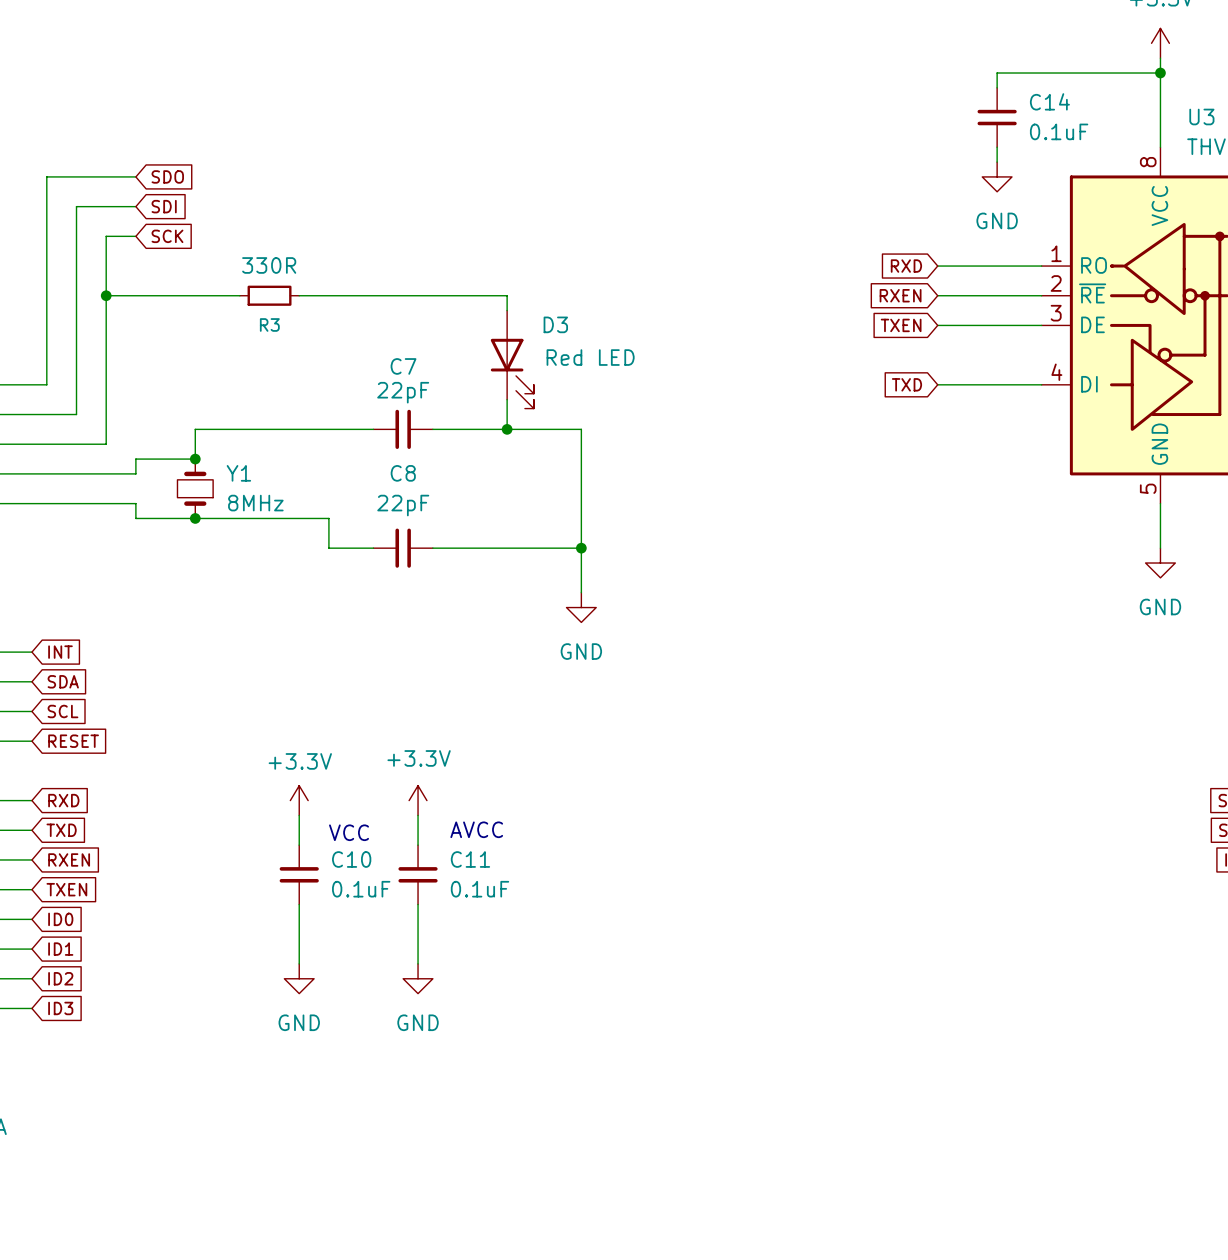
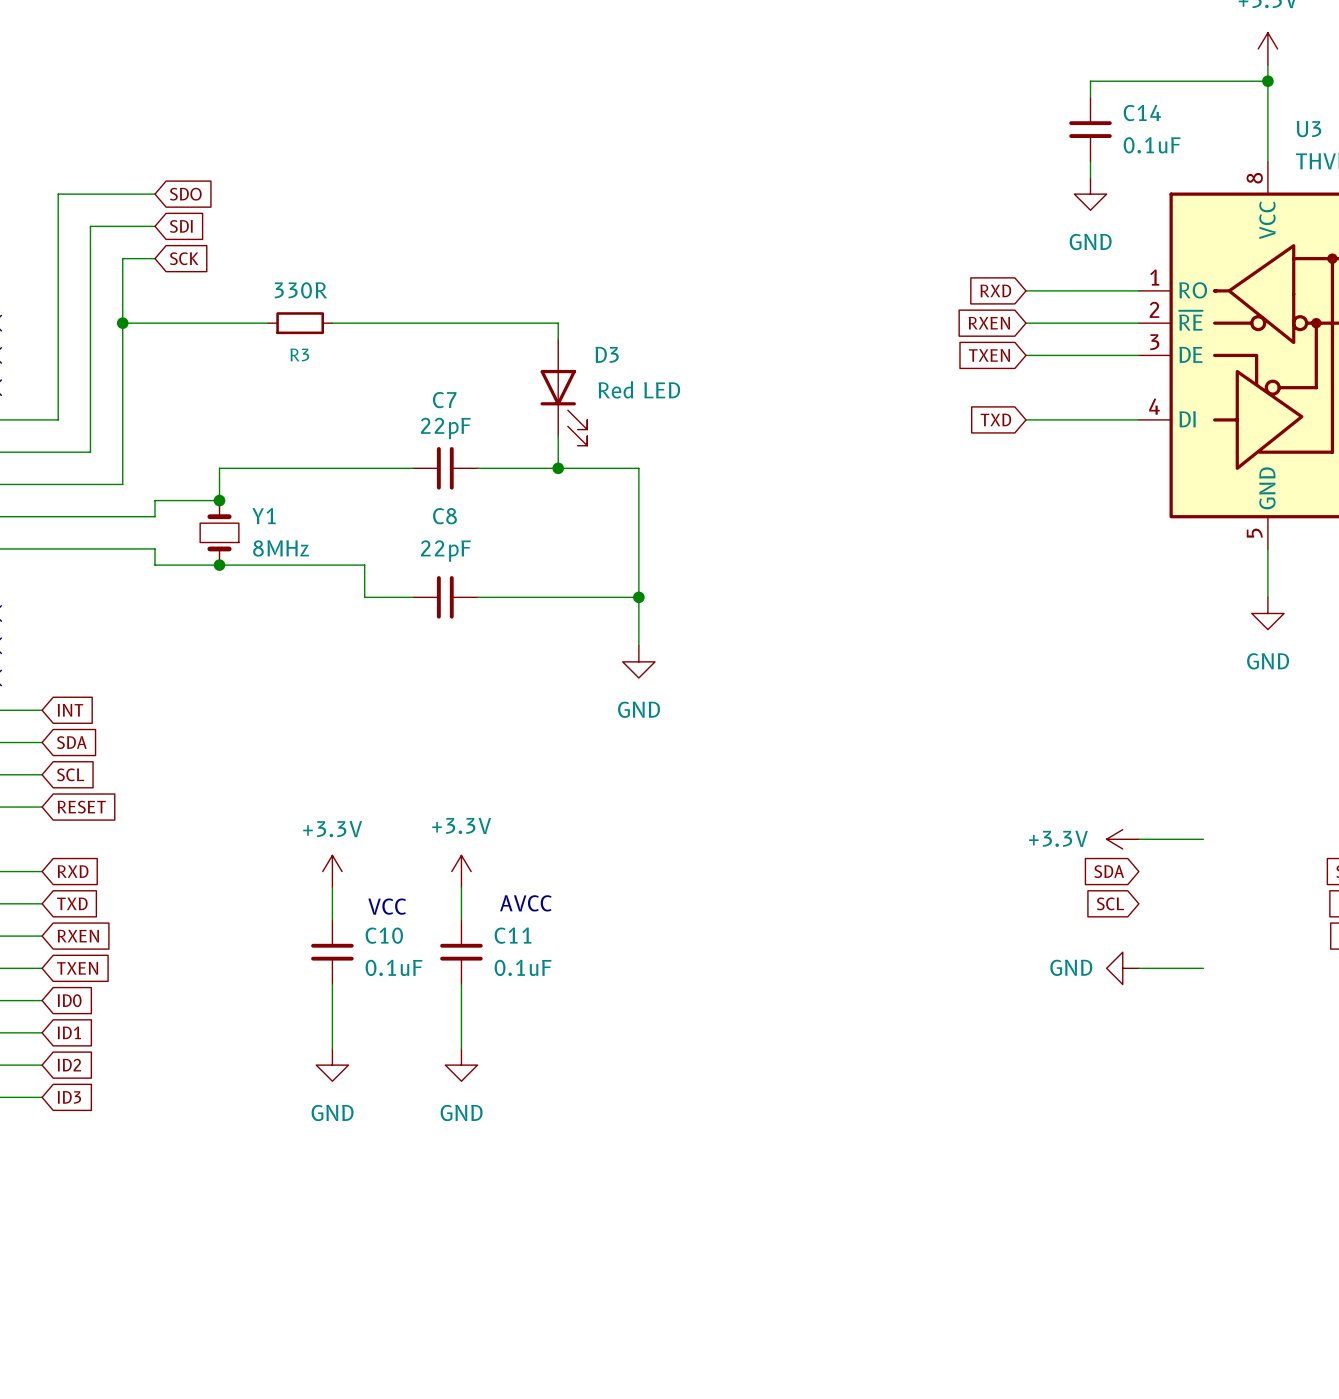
power symbol: none -> +3.3V (1122, 839)
wire: none -> (1138, 839) (1203, 839)
global label: none -> SDA (1109, 871)
global label: none -> SCL (1110, 903)
power symbol: none -> GND (1122, 968)
wire: none -> (1138, 968) (1203, 968)

